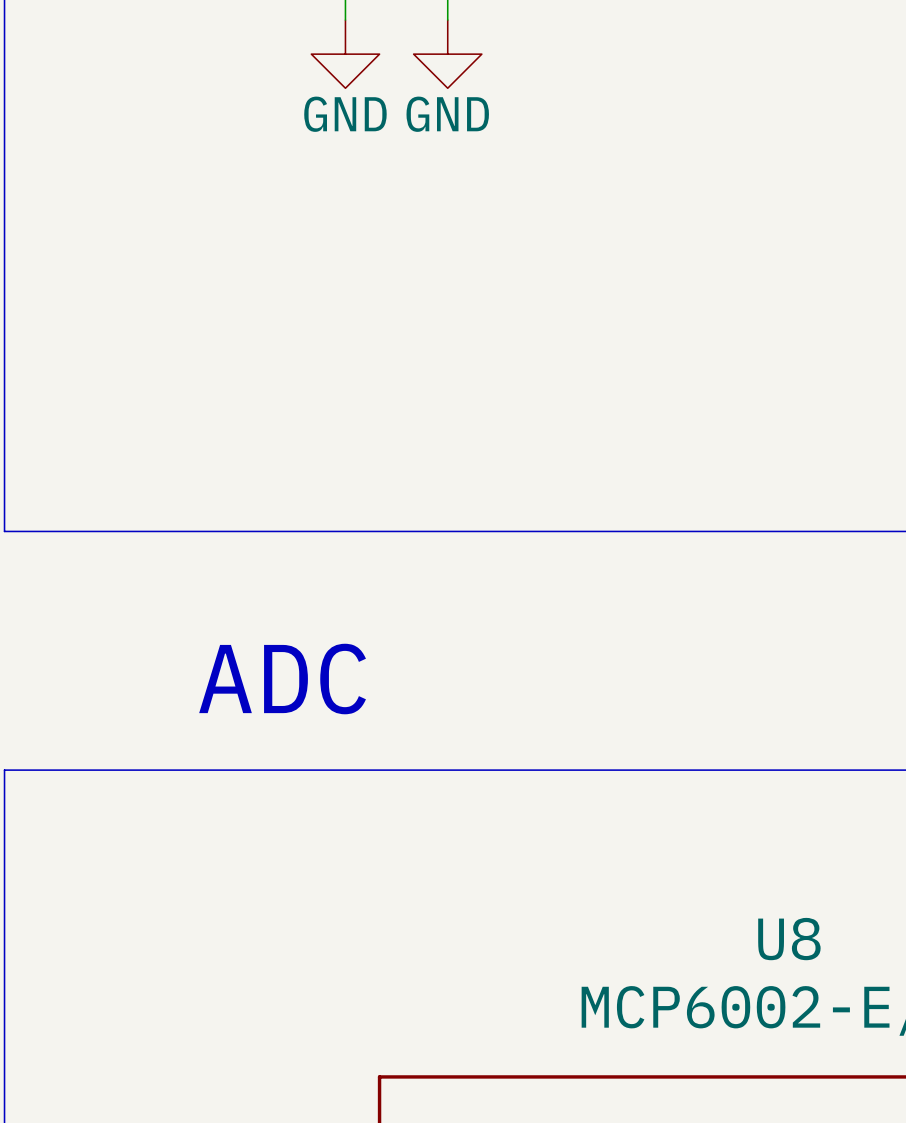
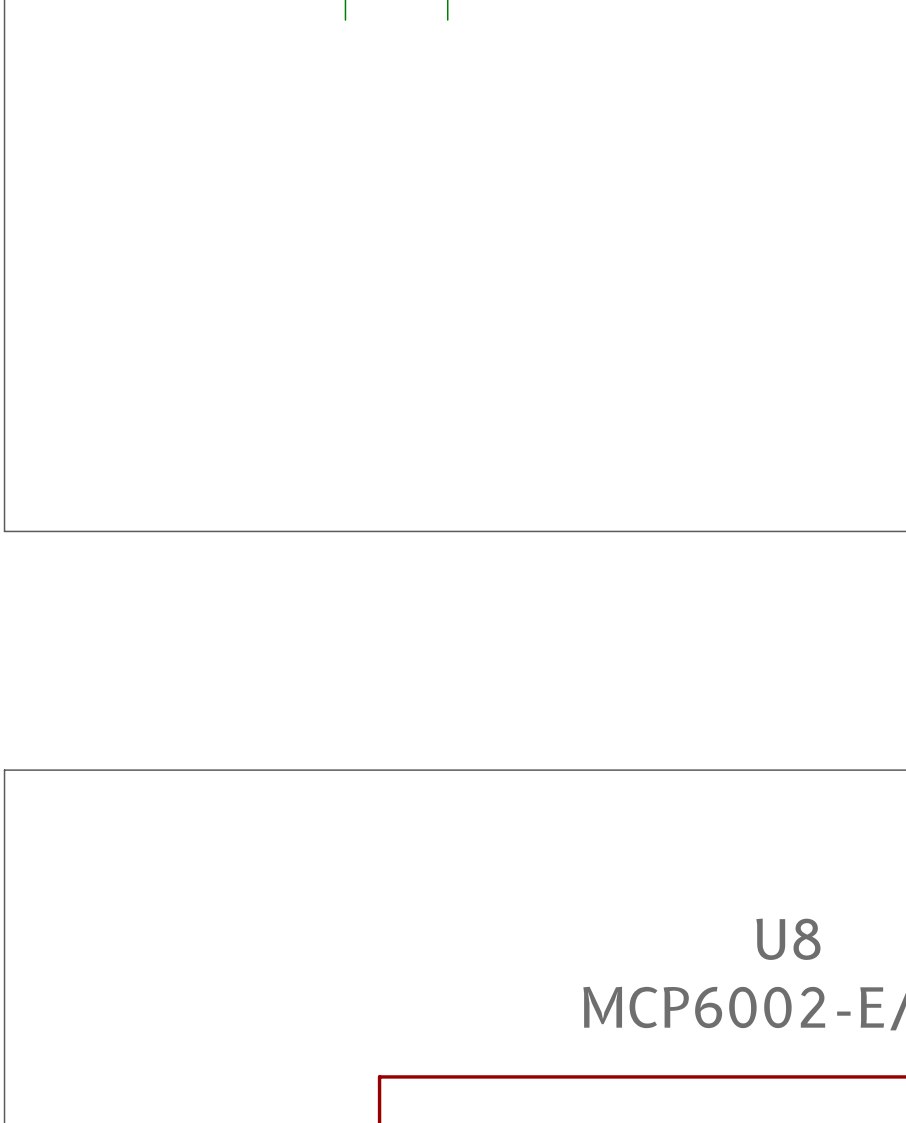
power symbol: GND (345, 54) -> none
power symbol: GND (447, 54) -> none
text: ADC (282, 679) -> none

